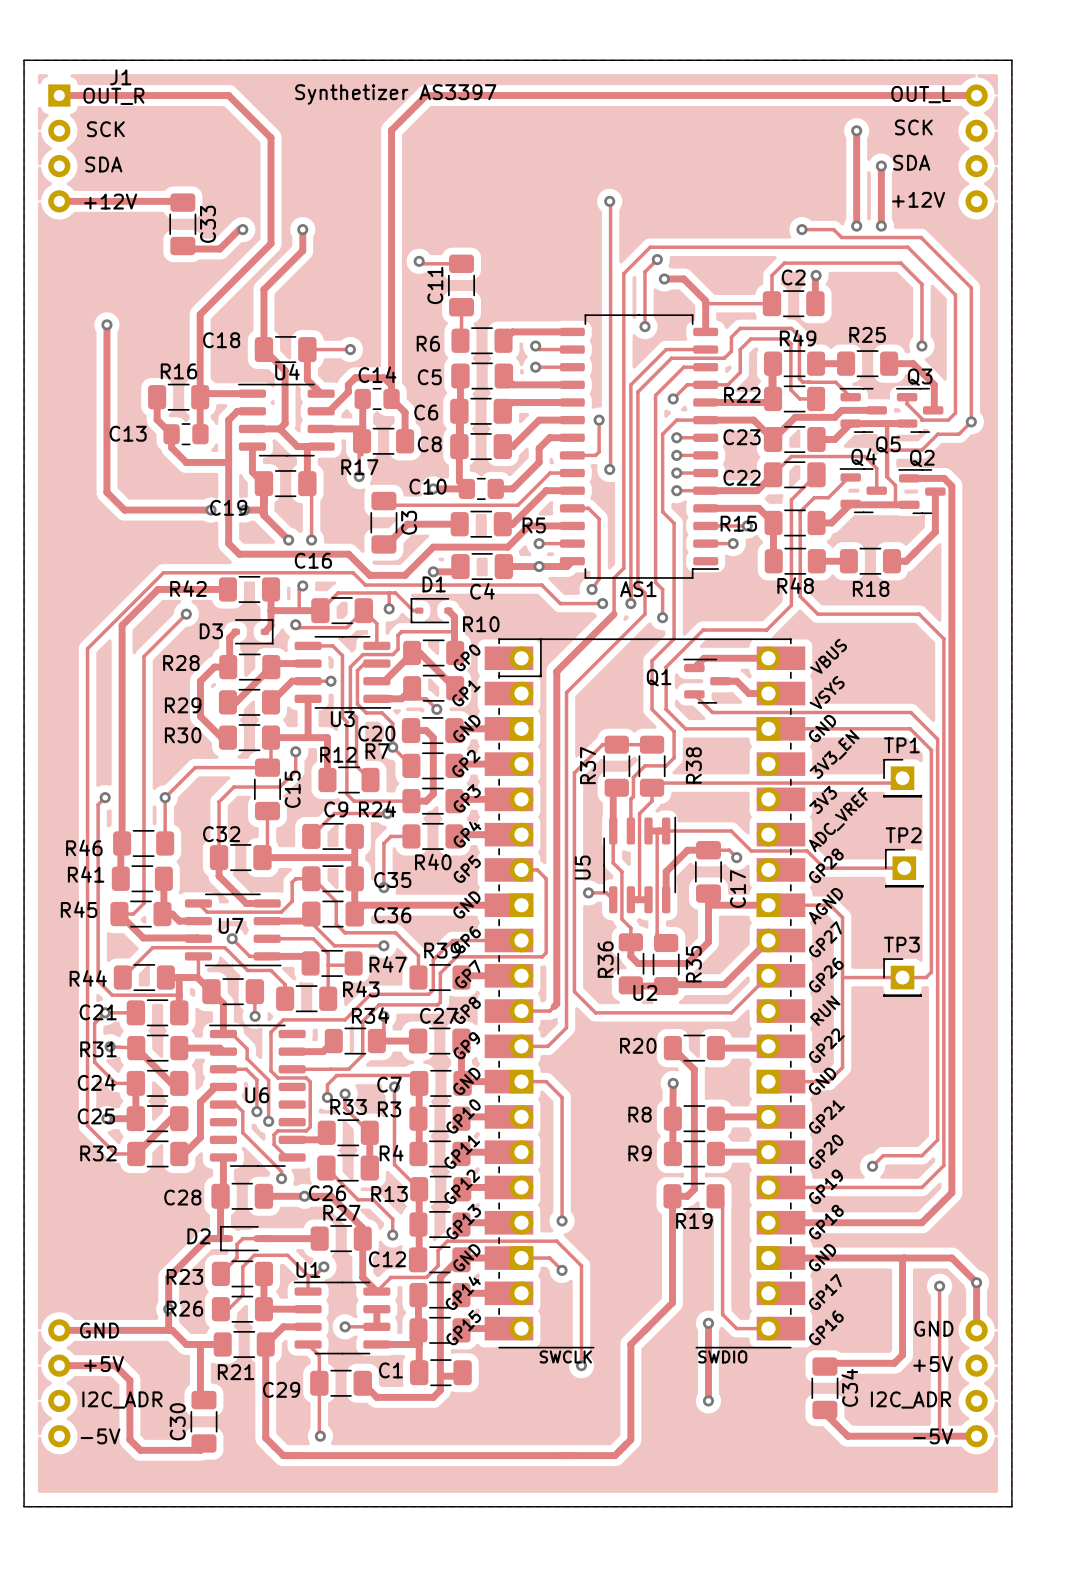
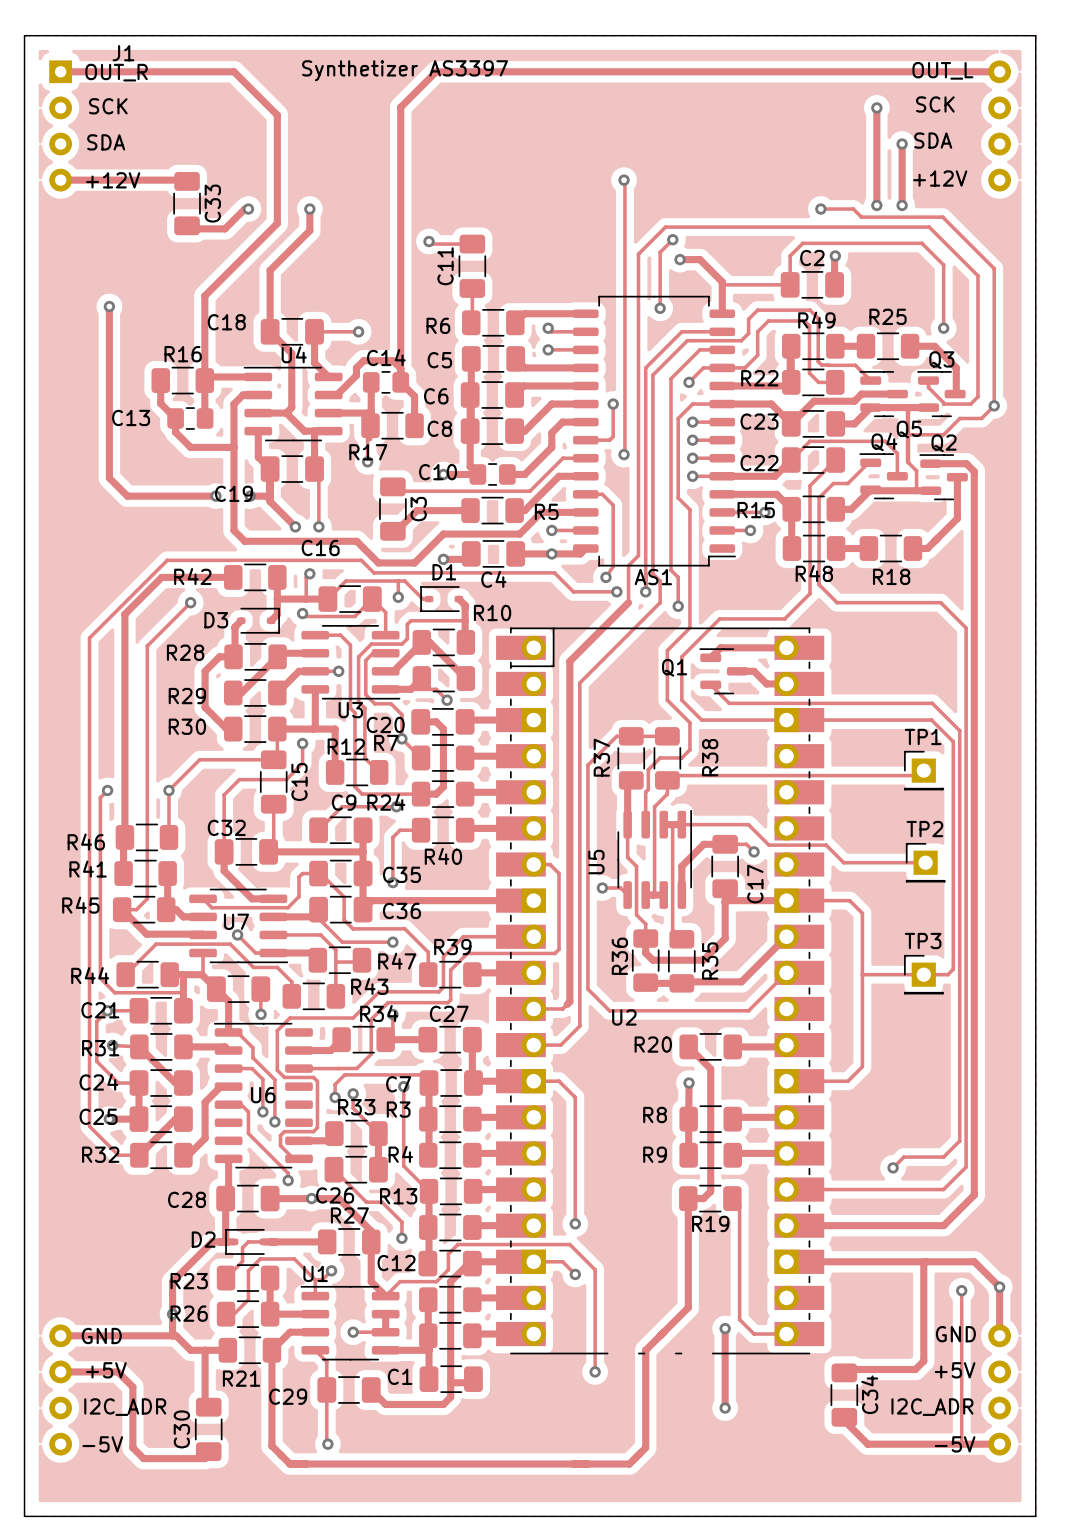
U2 footprint: [484, 638, 806, 1349] -> [496, 627, 825, 1355]
U2 name position: U2 (645, 992) -> U2 (624, 1017)

